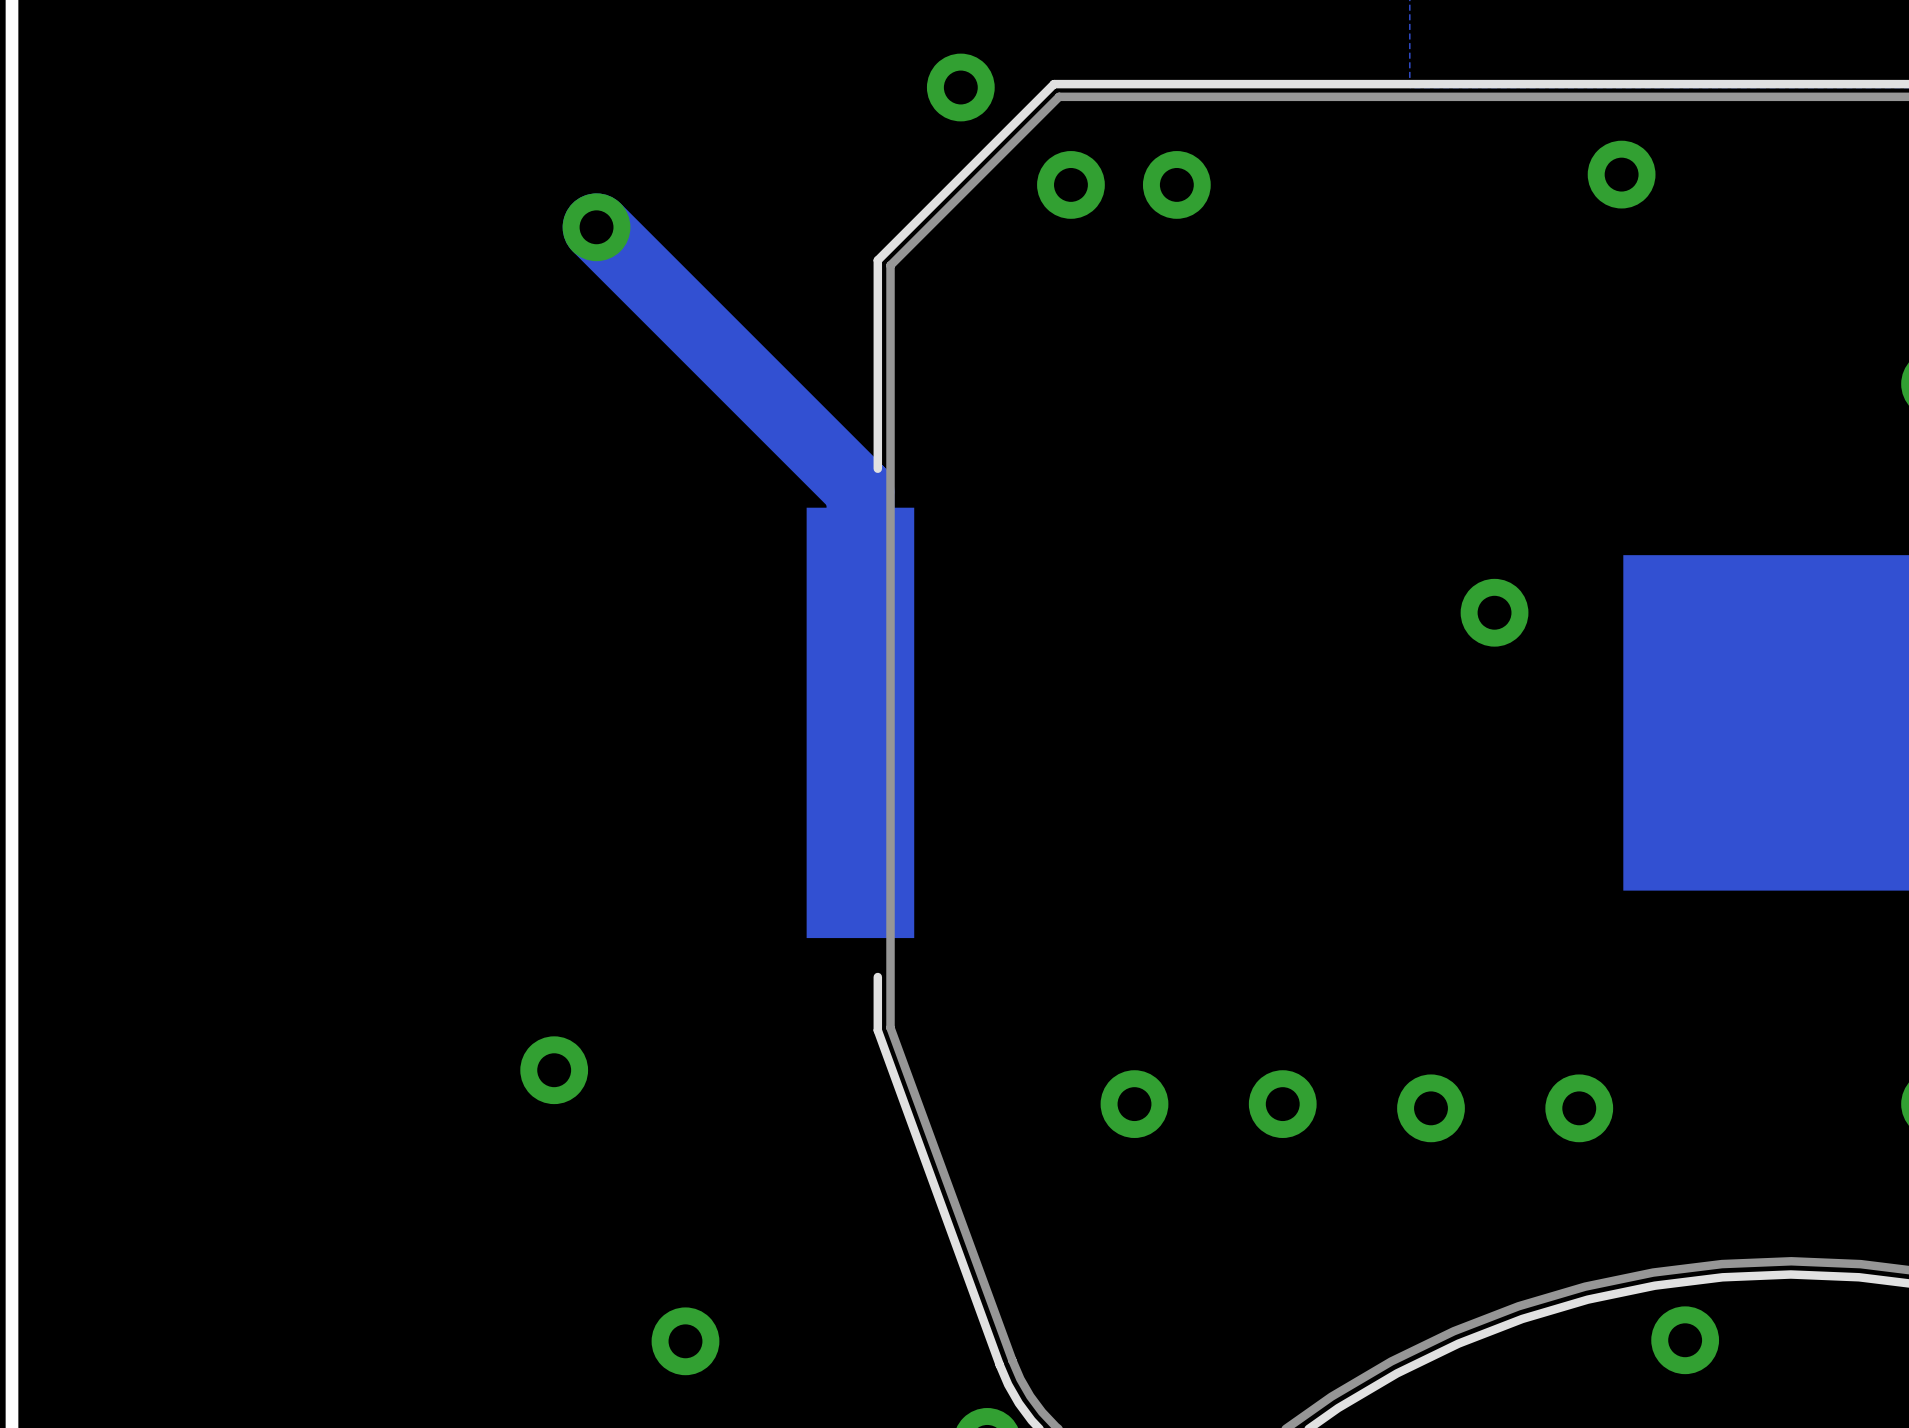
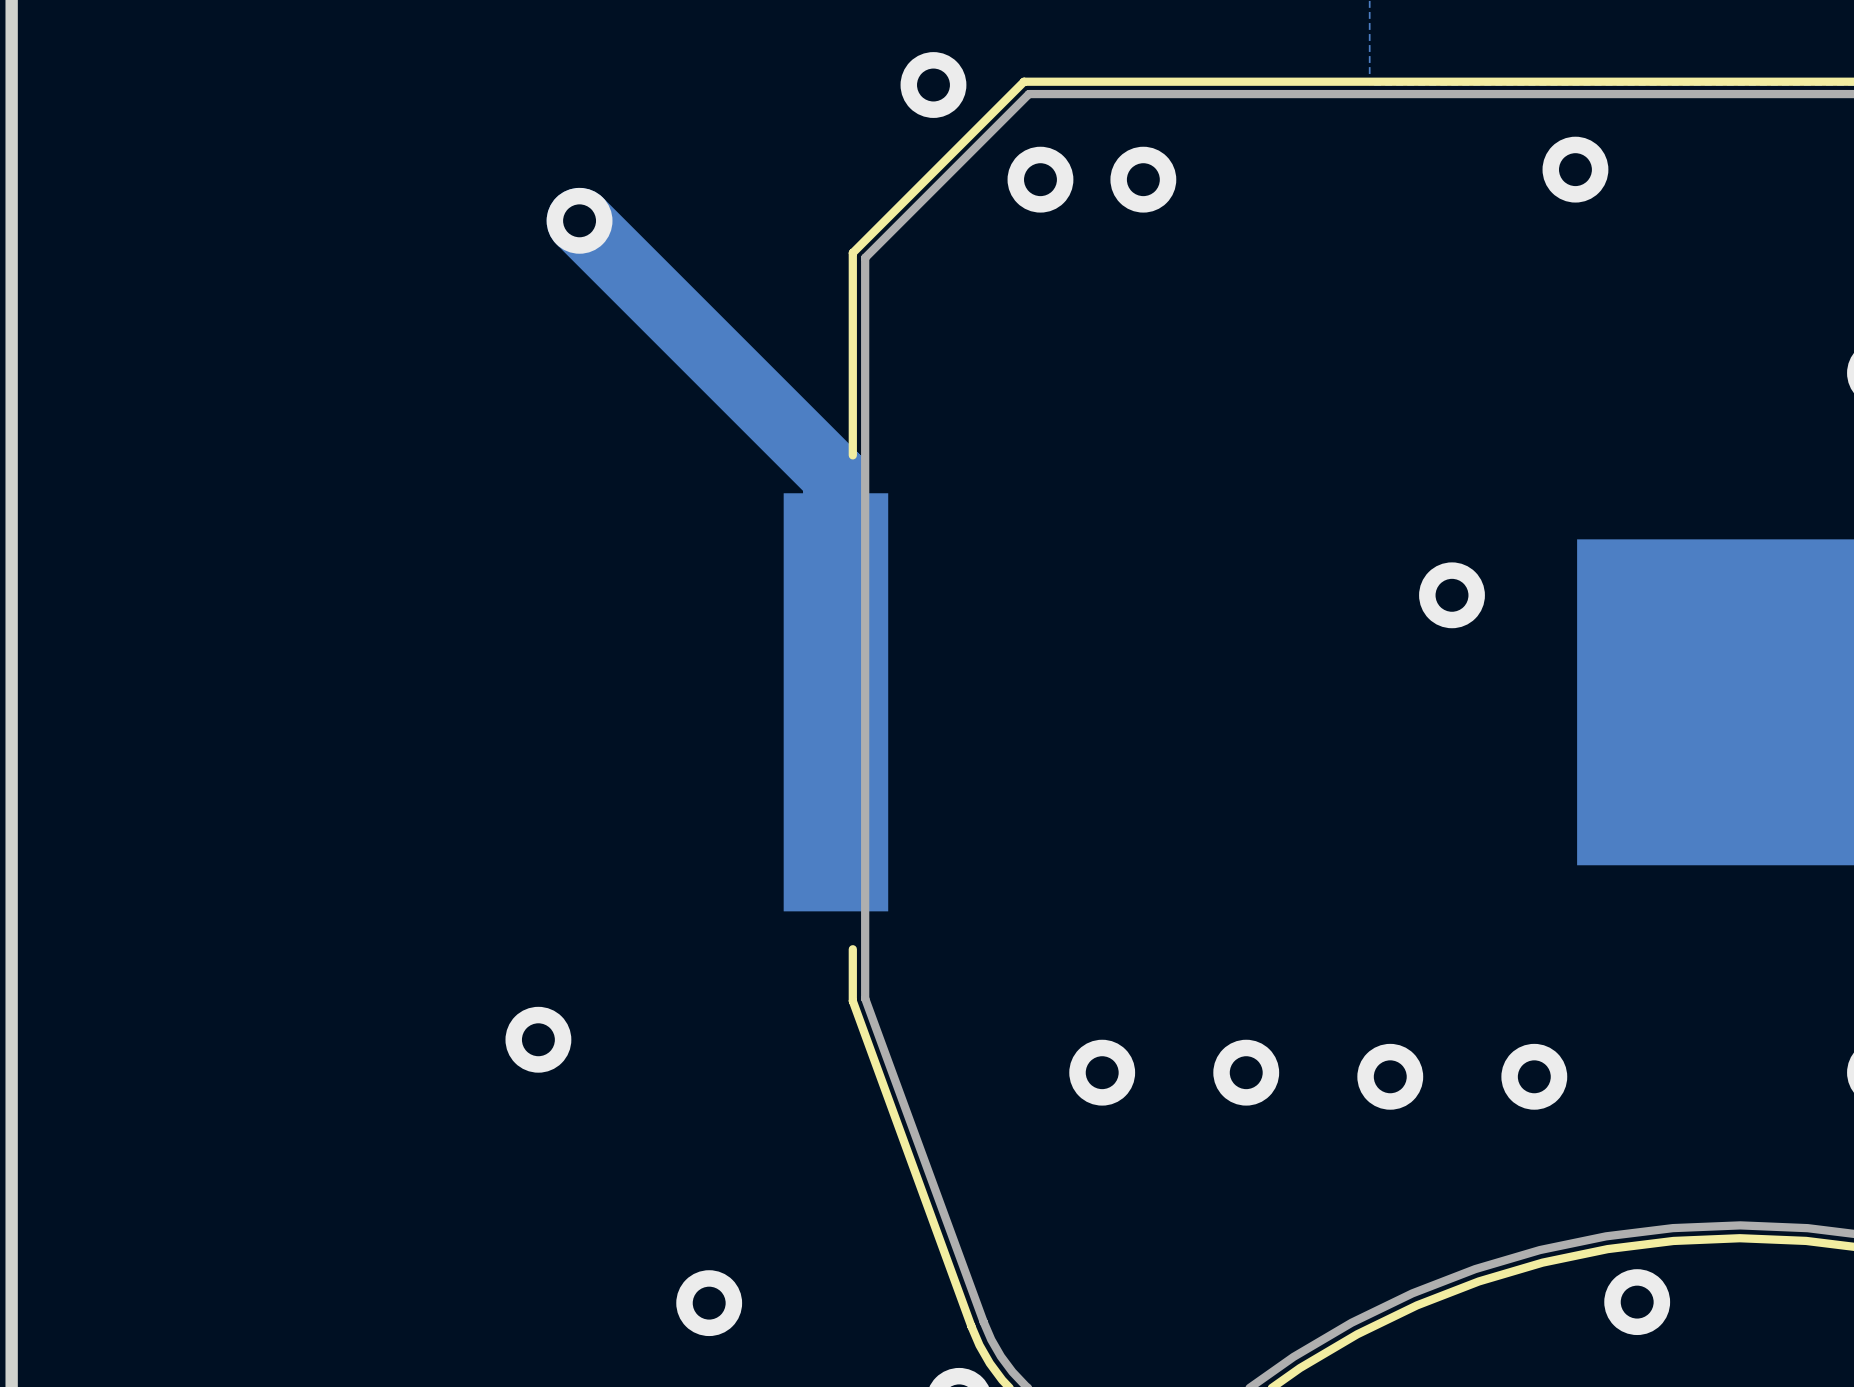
via position: (685, 1341) -> (709, 1303)

